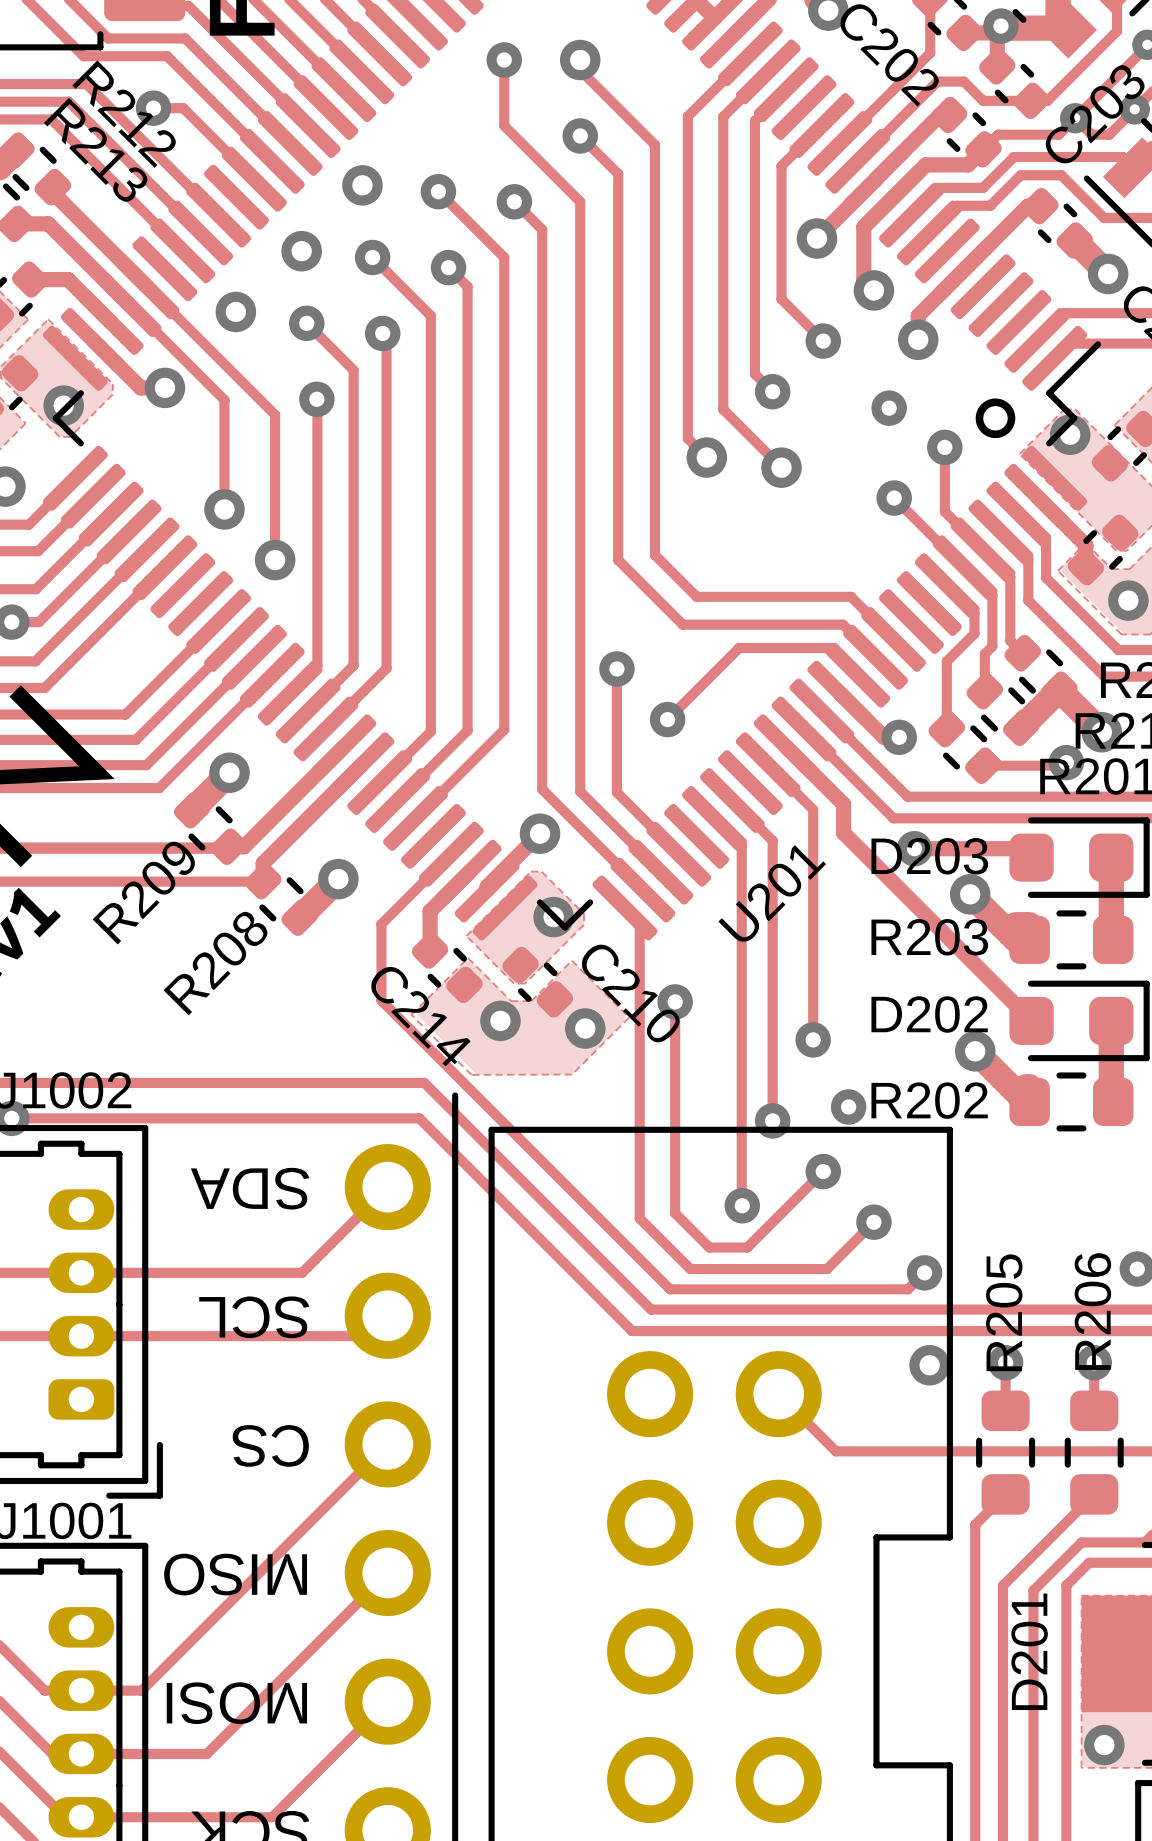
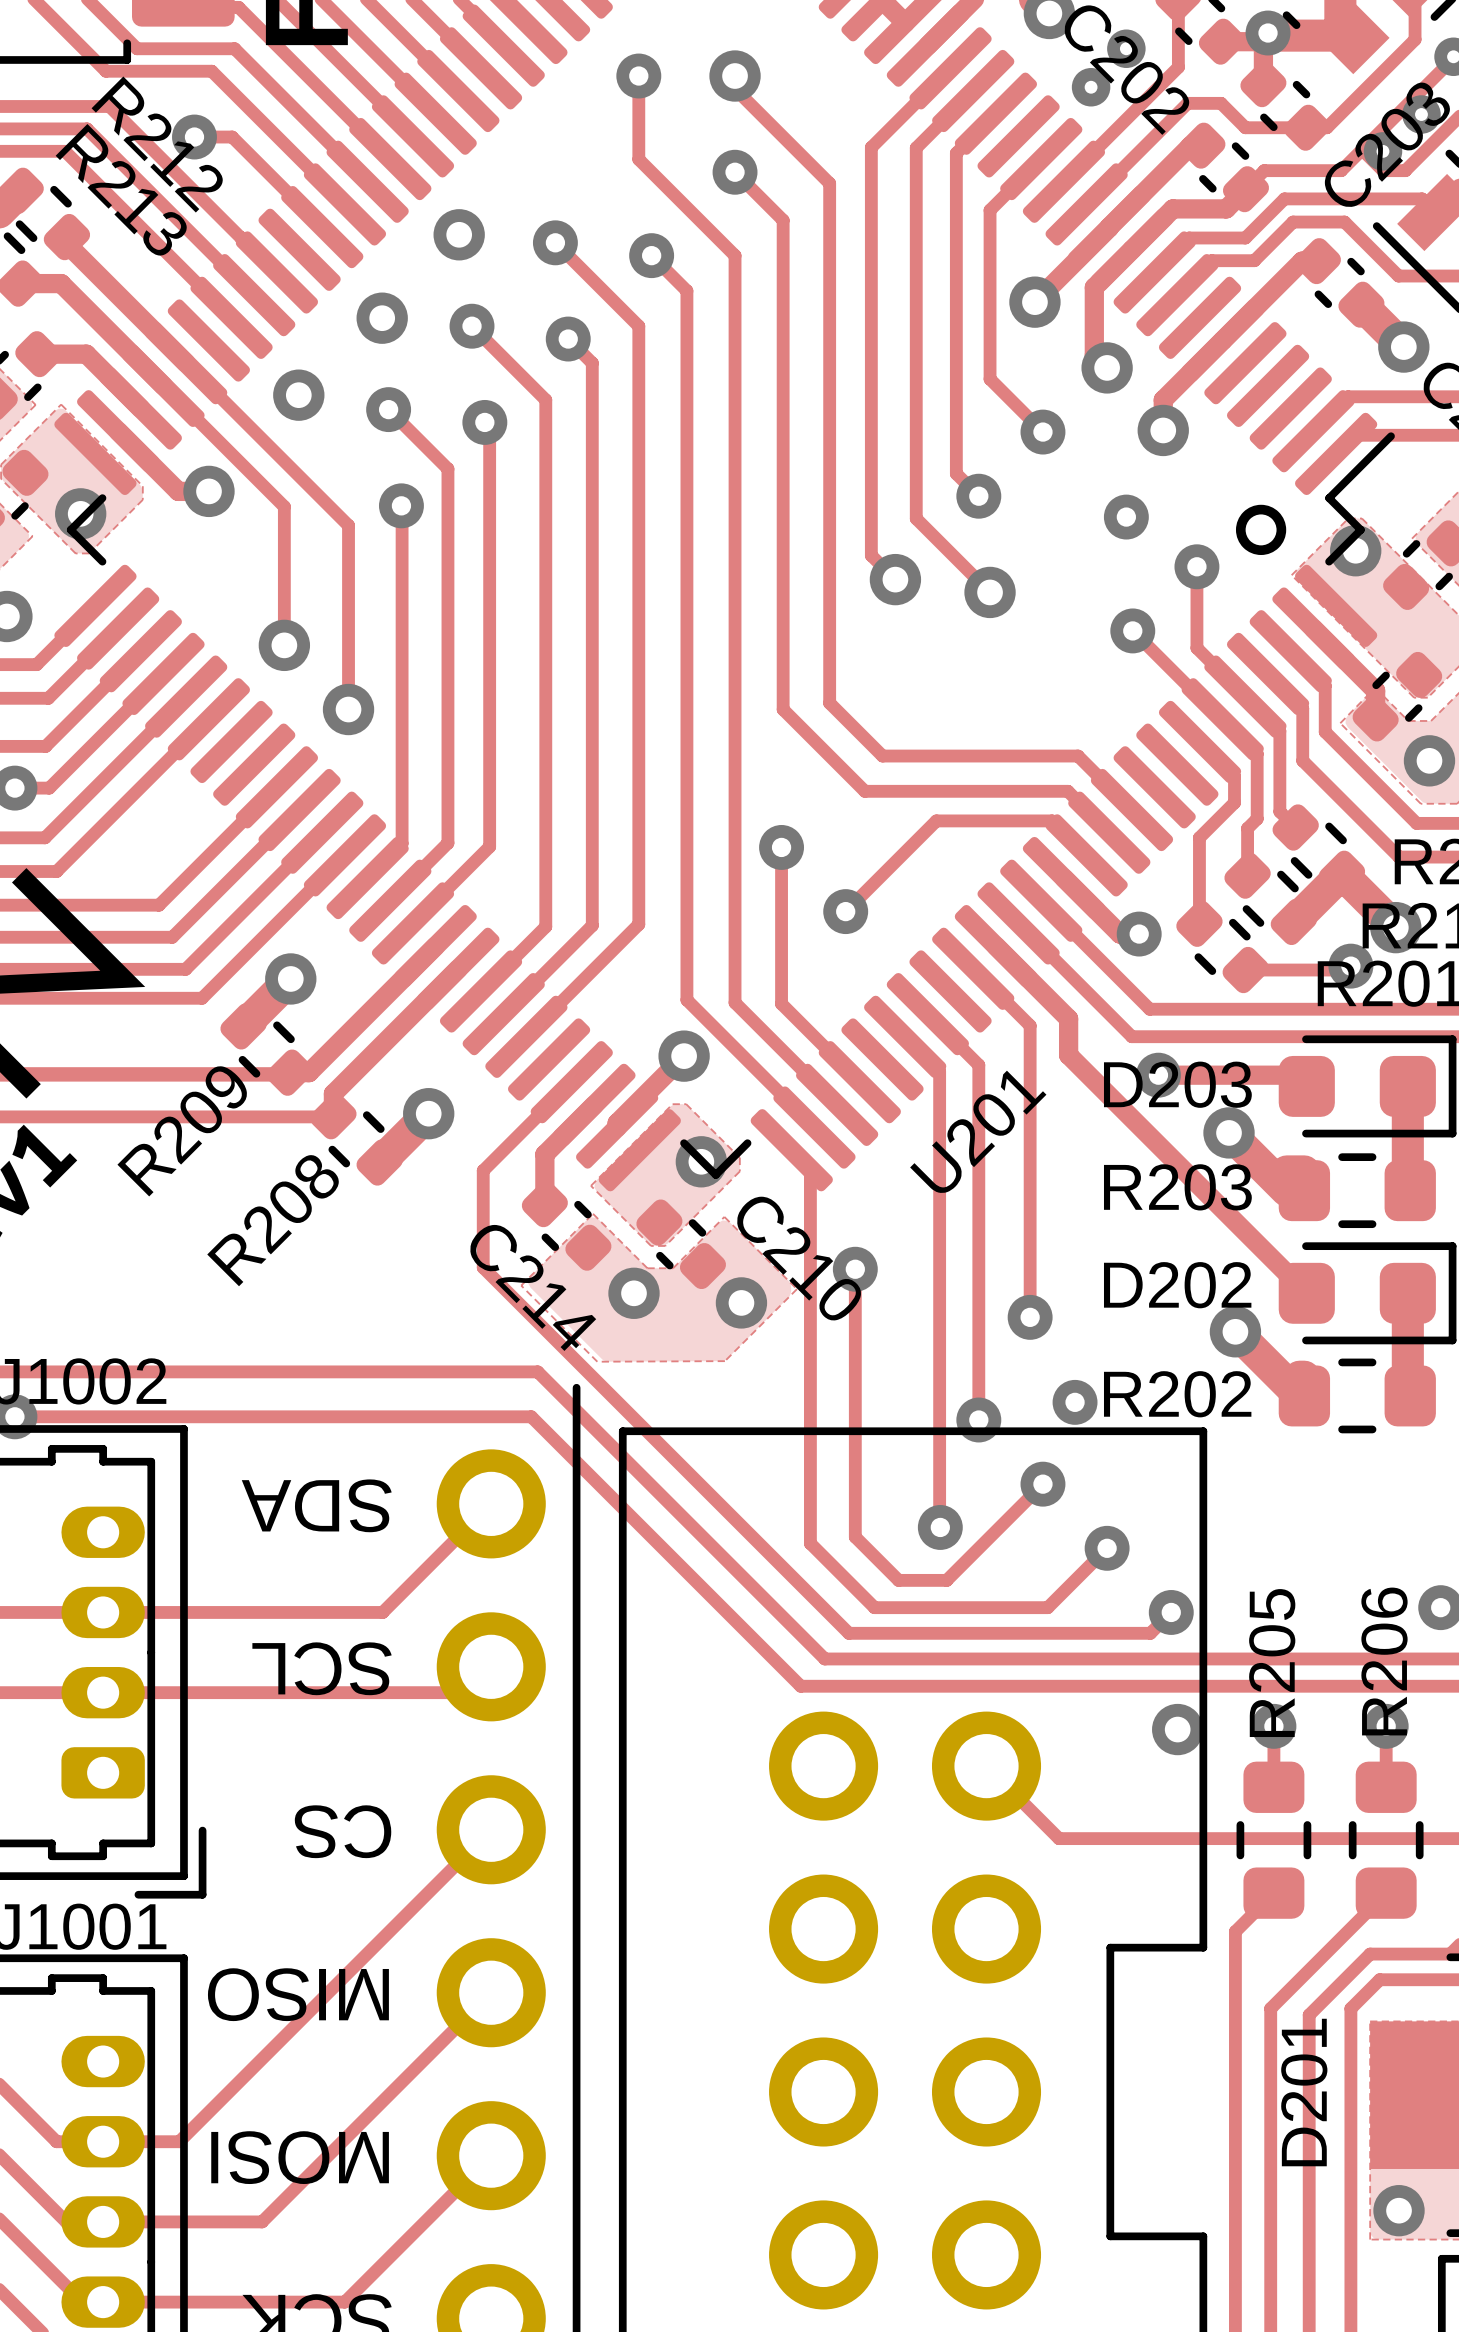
via: none -> (1126, 48)
via: none -> (1091, 87)
via position: (1134, 109) -> (1421, 114)
via position: (1075, 118) -> (1382, 151)

